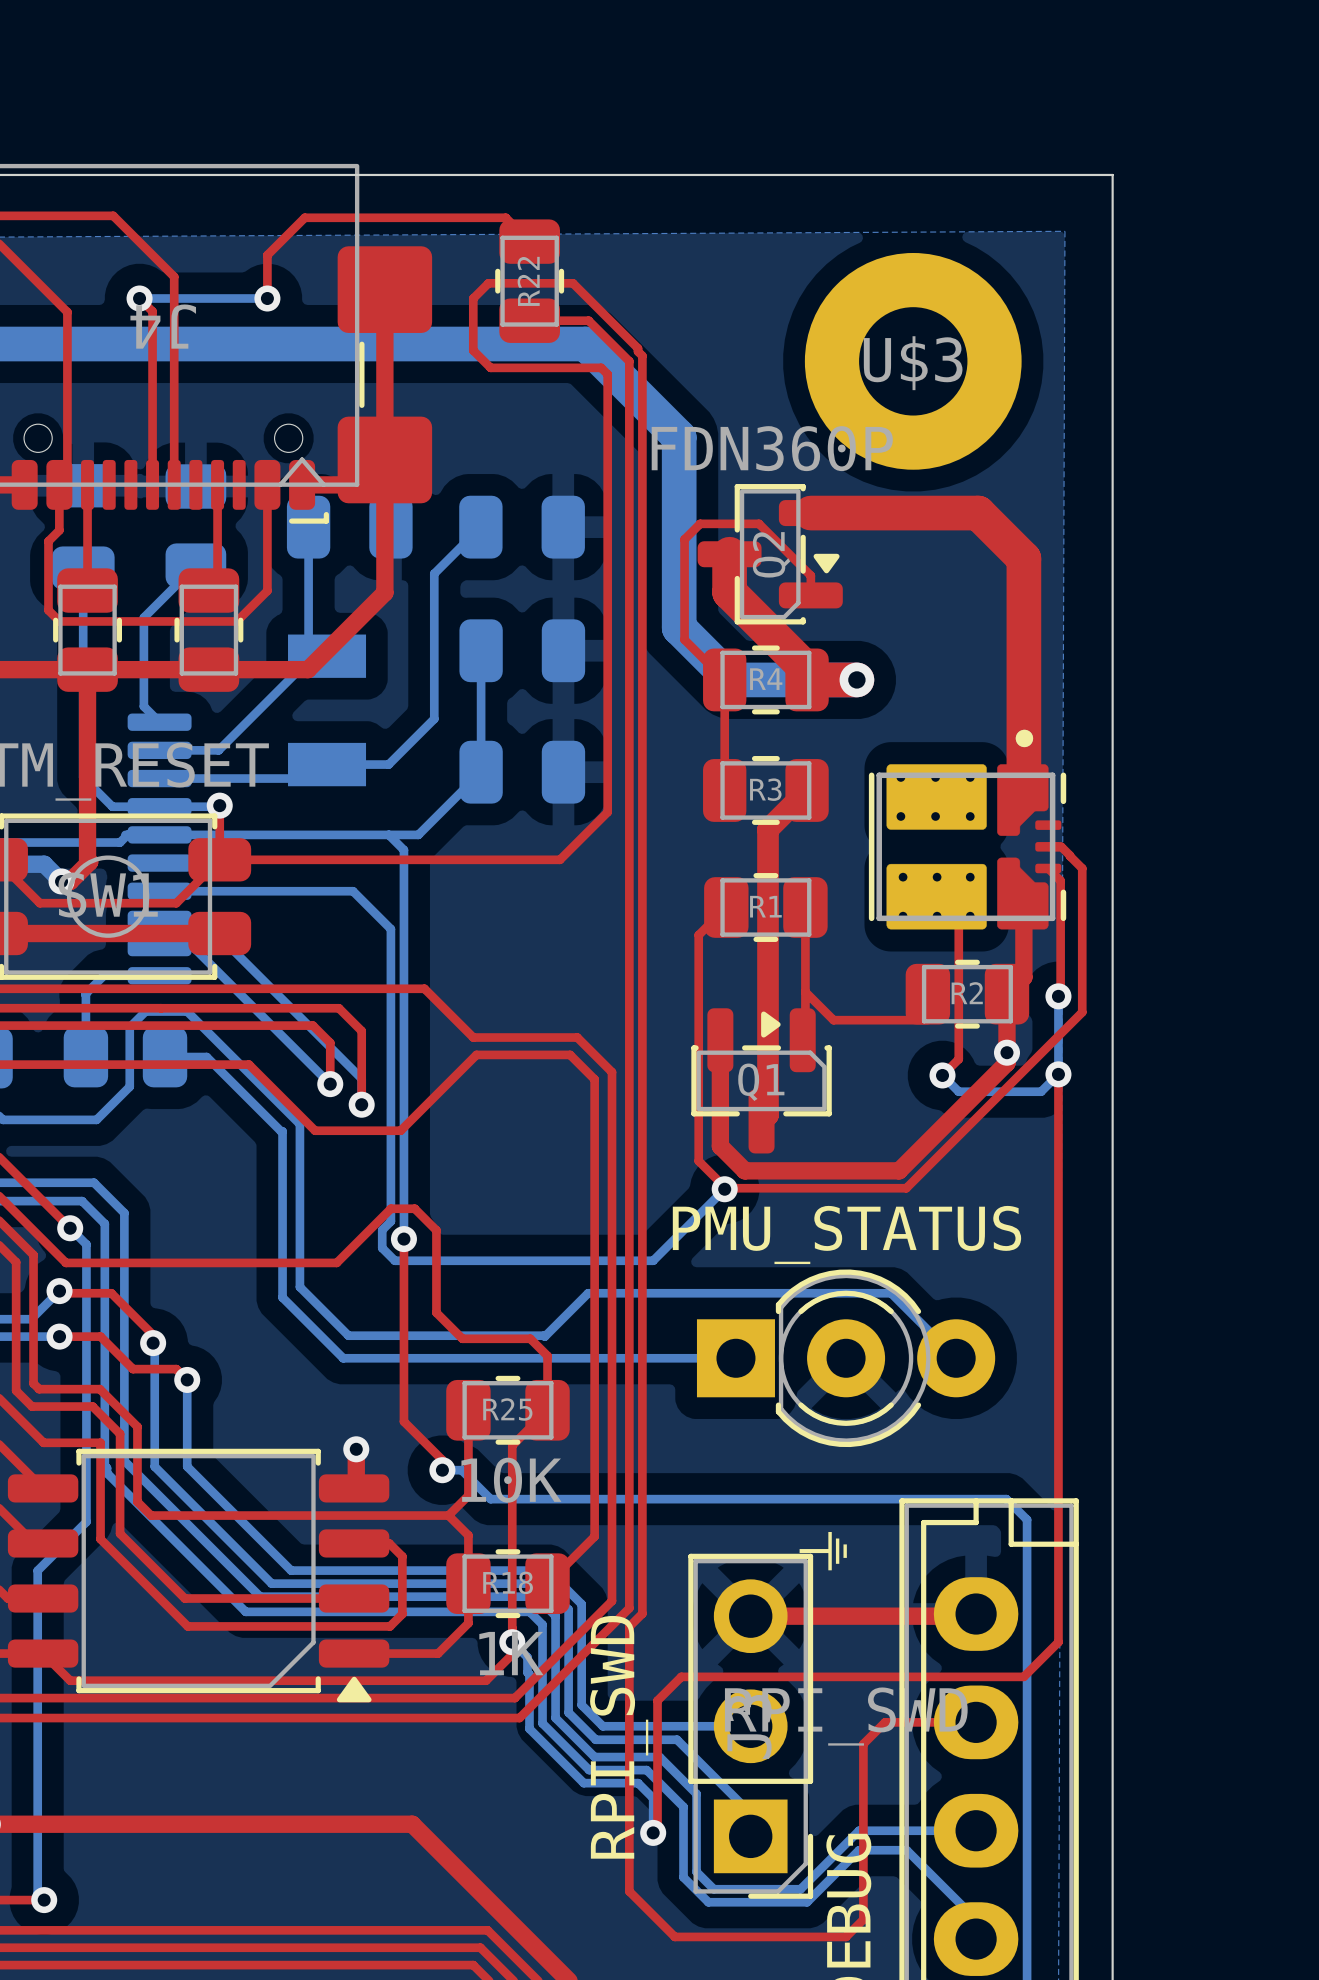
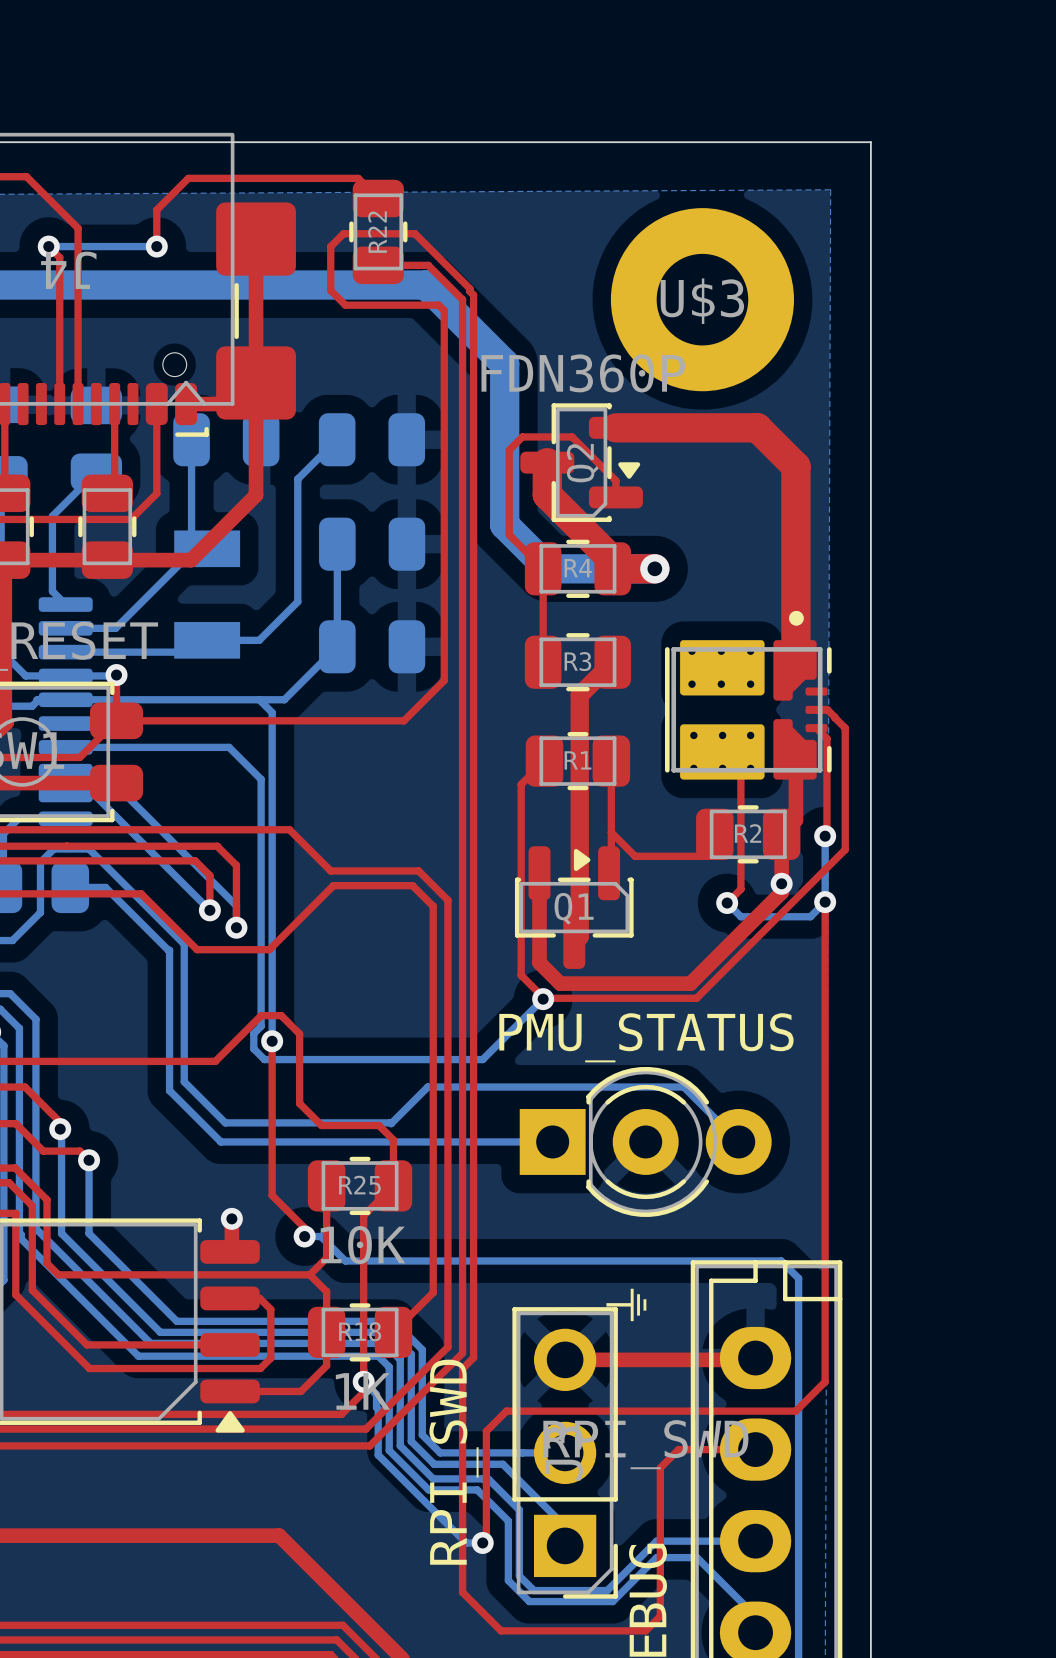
bottom track: (583, 1783) (638, 1783) (653, 1798) (653, 1832) -> (424, 1500) (466, 1542) (482, 1542)

